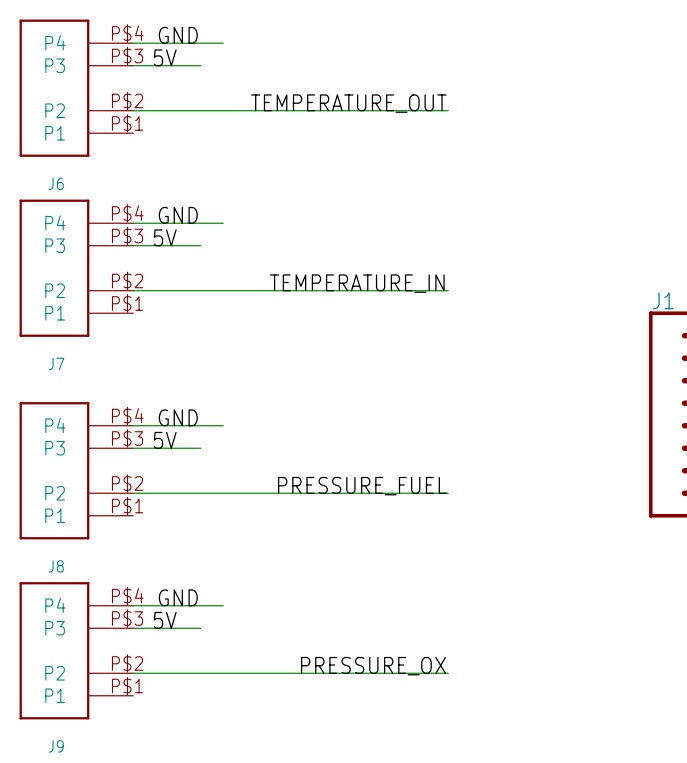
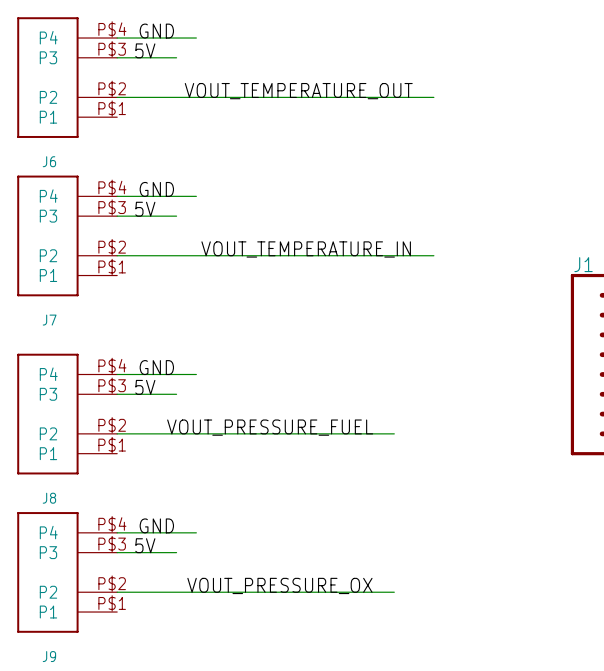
label: TEMPERATURE_OUT (348, 103) -> VOUT_TEMPERATURE_OUT (298, 91)
wire: none -> (394, 97) (433, 97)
label: TEMPERATURE_IN (357, 283) -> VOUT_TEMPERATURE_IN (306, 249)
wire: none -> (394, 255) (433, 255)
label: PRESSURE_FUEL (362, 486) -> VOUT_PRESSURE_FUEL (270, 427)
label: PRESSURE_OX (373, 666) -> VOUT_PRESSURE_OX (279, 585)

